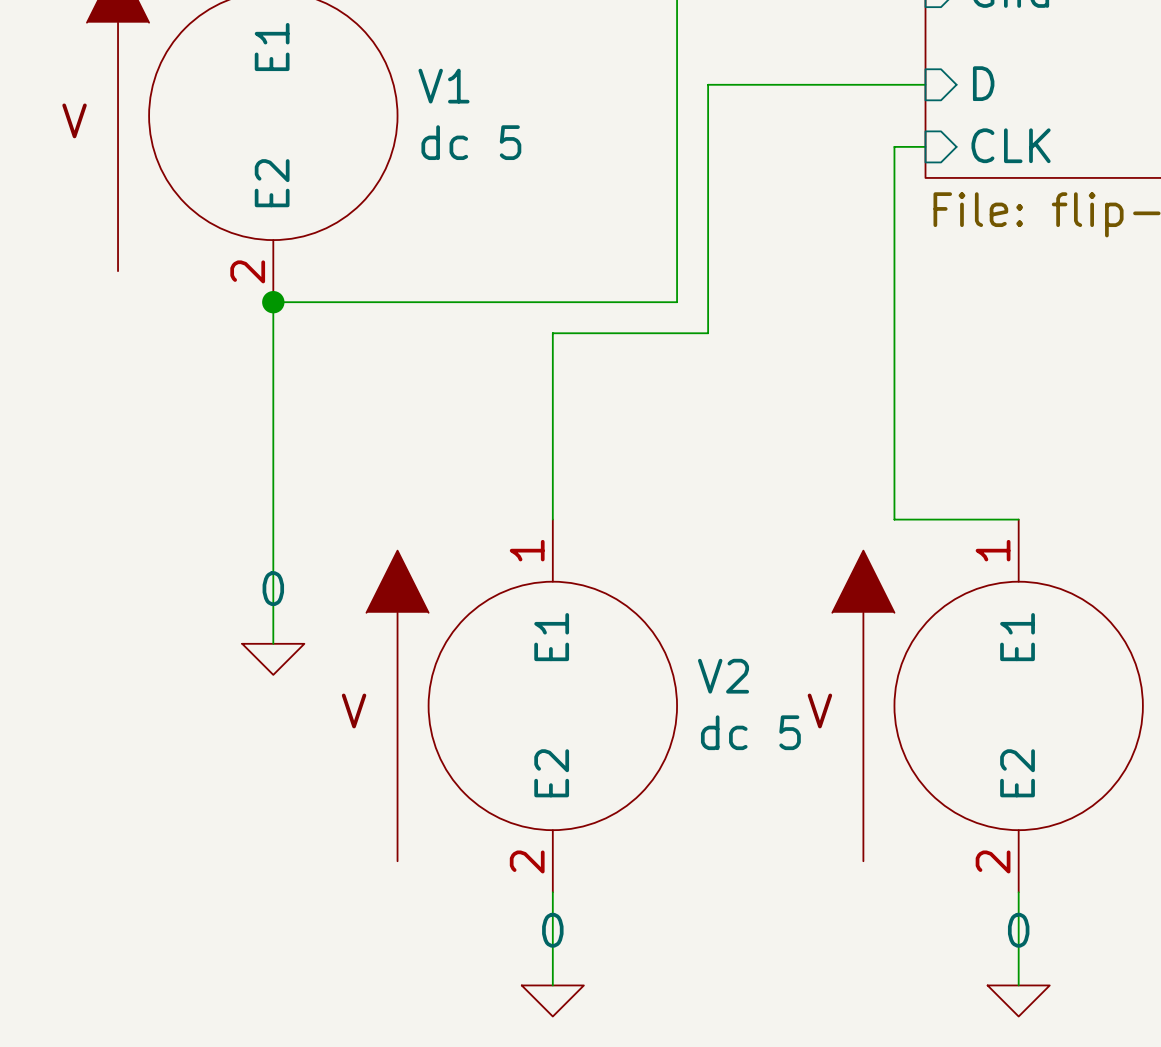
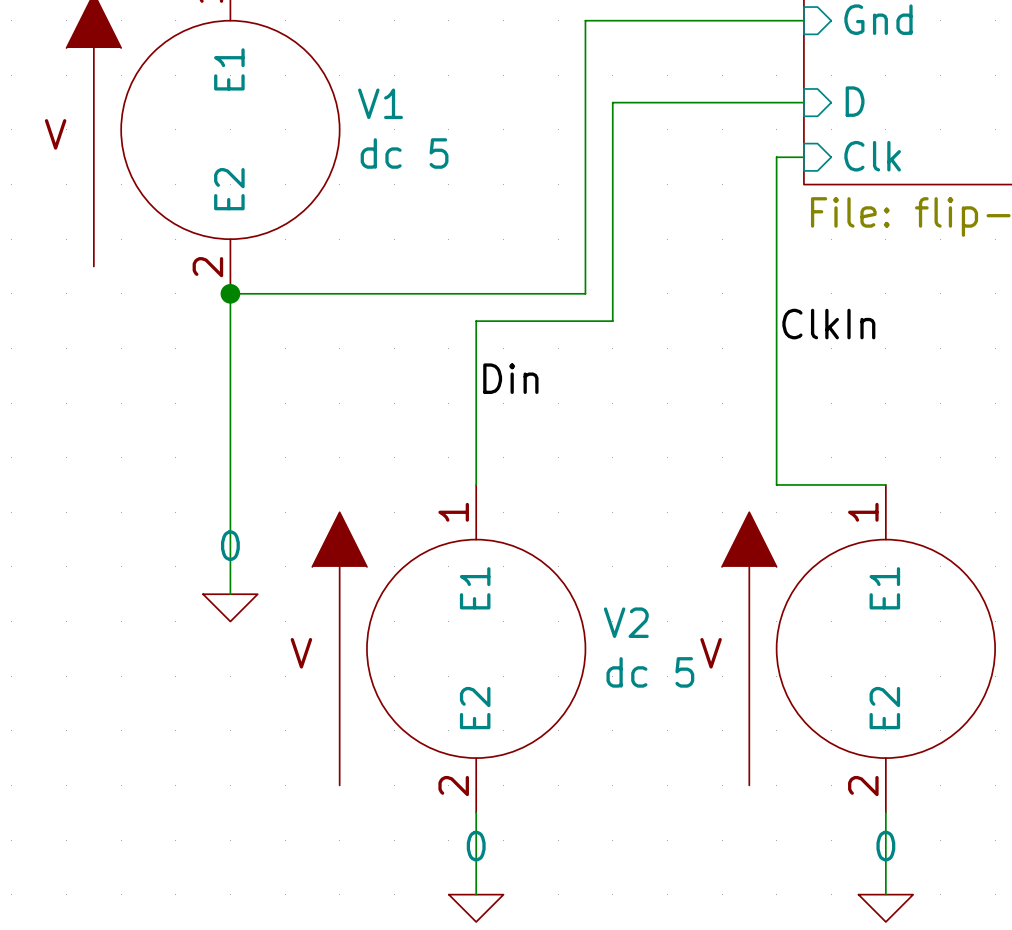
sheet pin: CLK (1011, 145) -> Clk (872, 156)
label: none -> ClkIn (828, 324)
label: none -> Din (510, 378)

